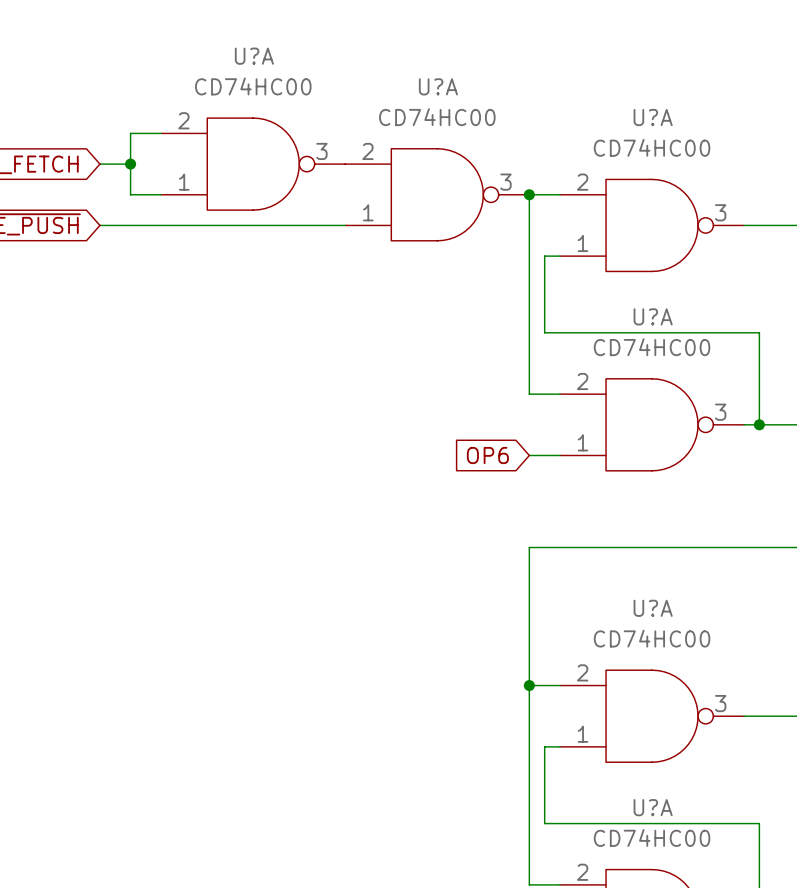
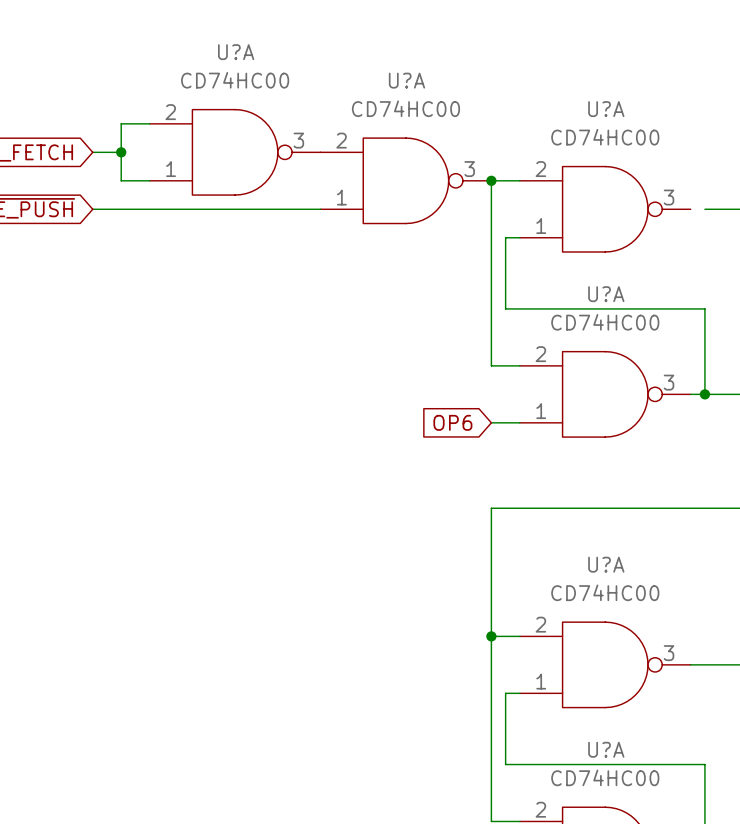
wire: (744, 225) (759, 225) -> none

